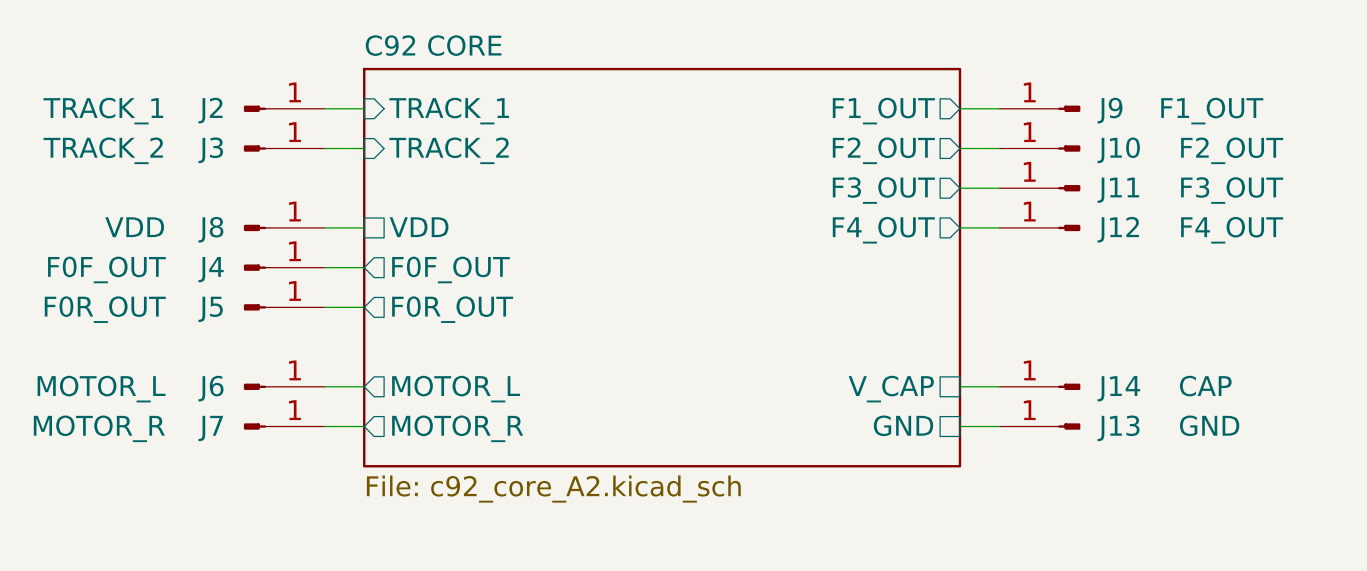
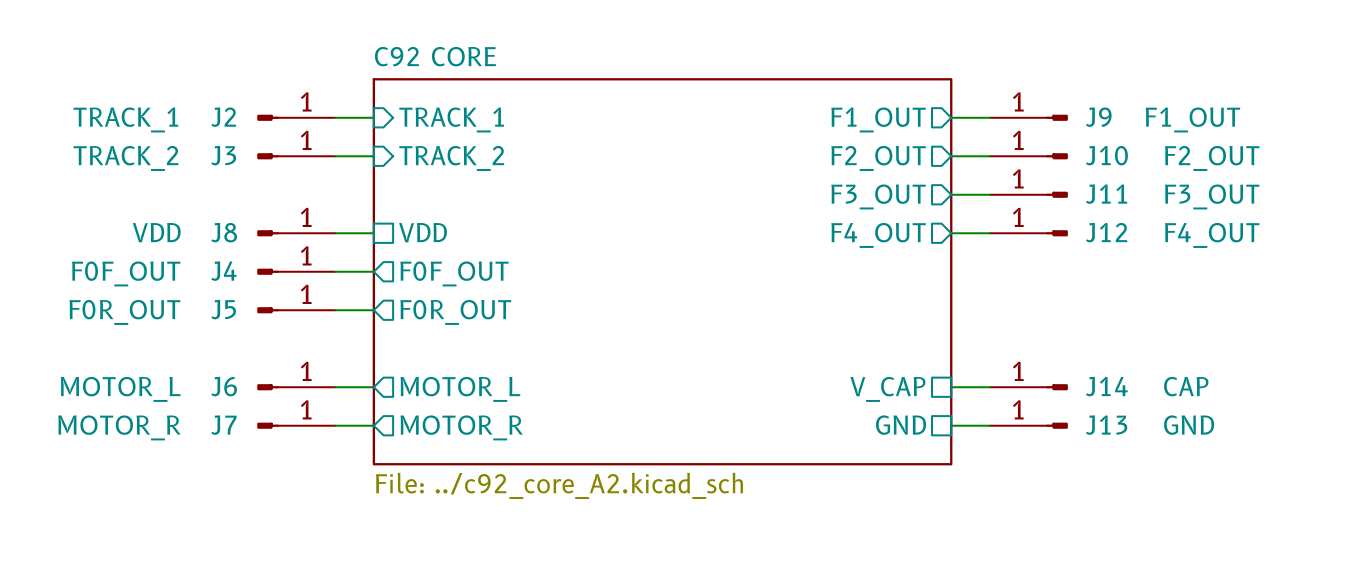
sheet C92 CORE value: File: c92_core_A2.kicad_sch (553, 489) -> File: ../c92_core_A2.kicad_sch (559, 485)

